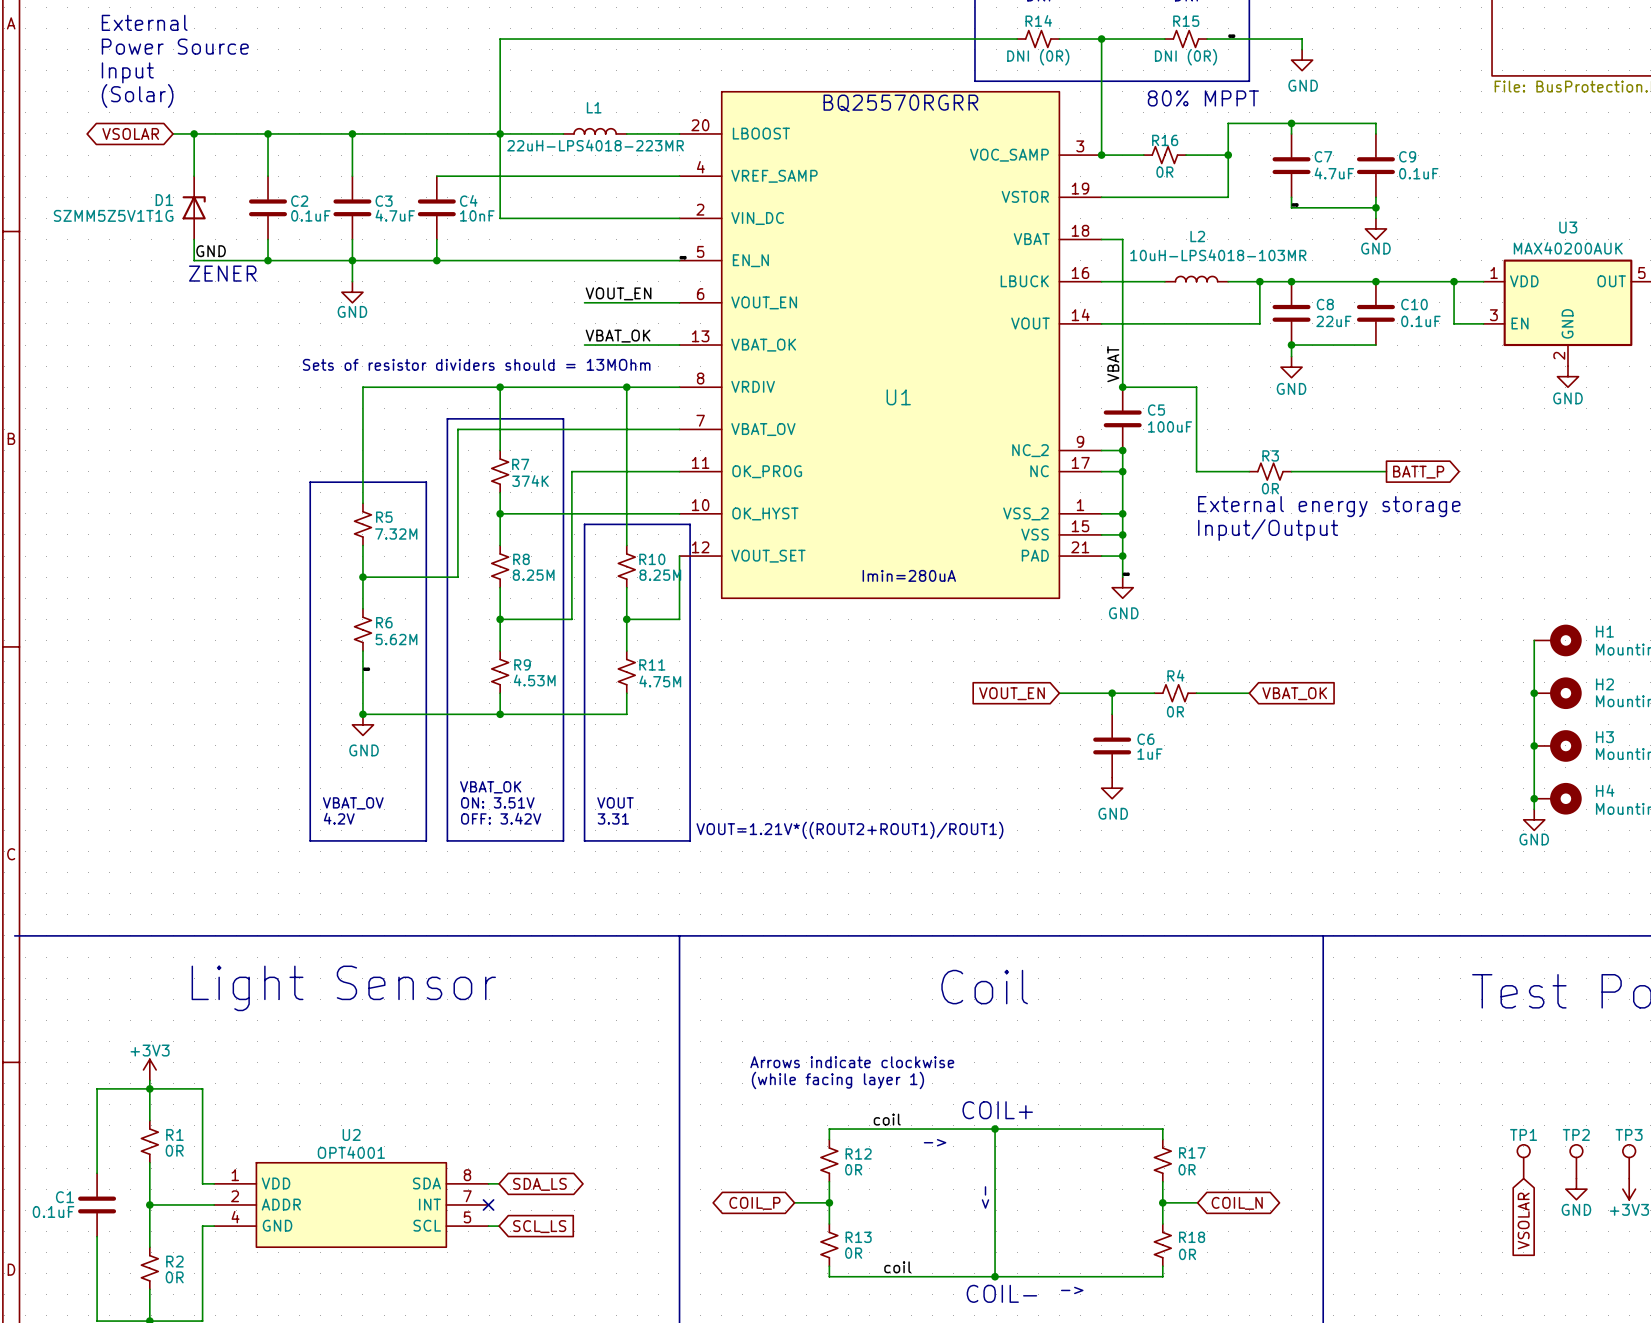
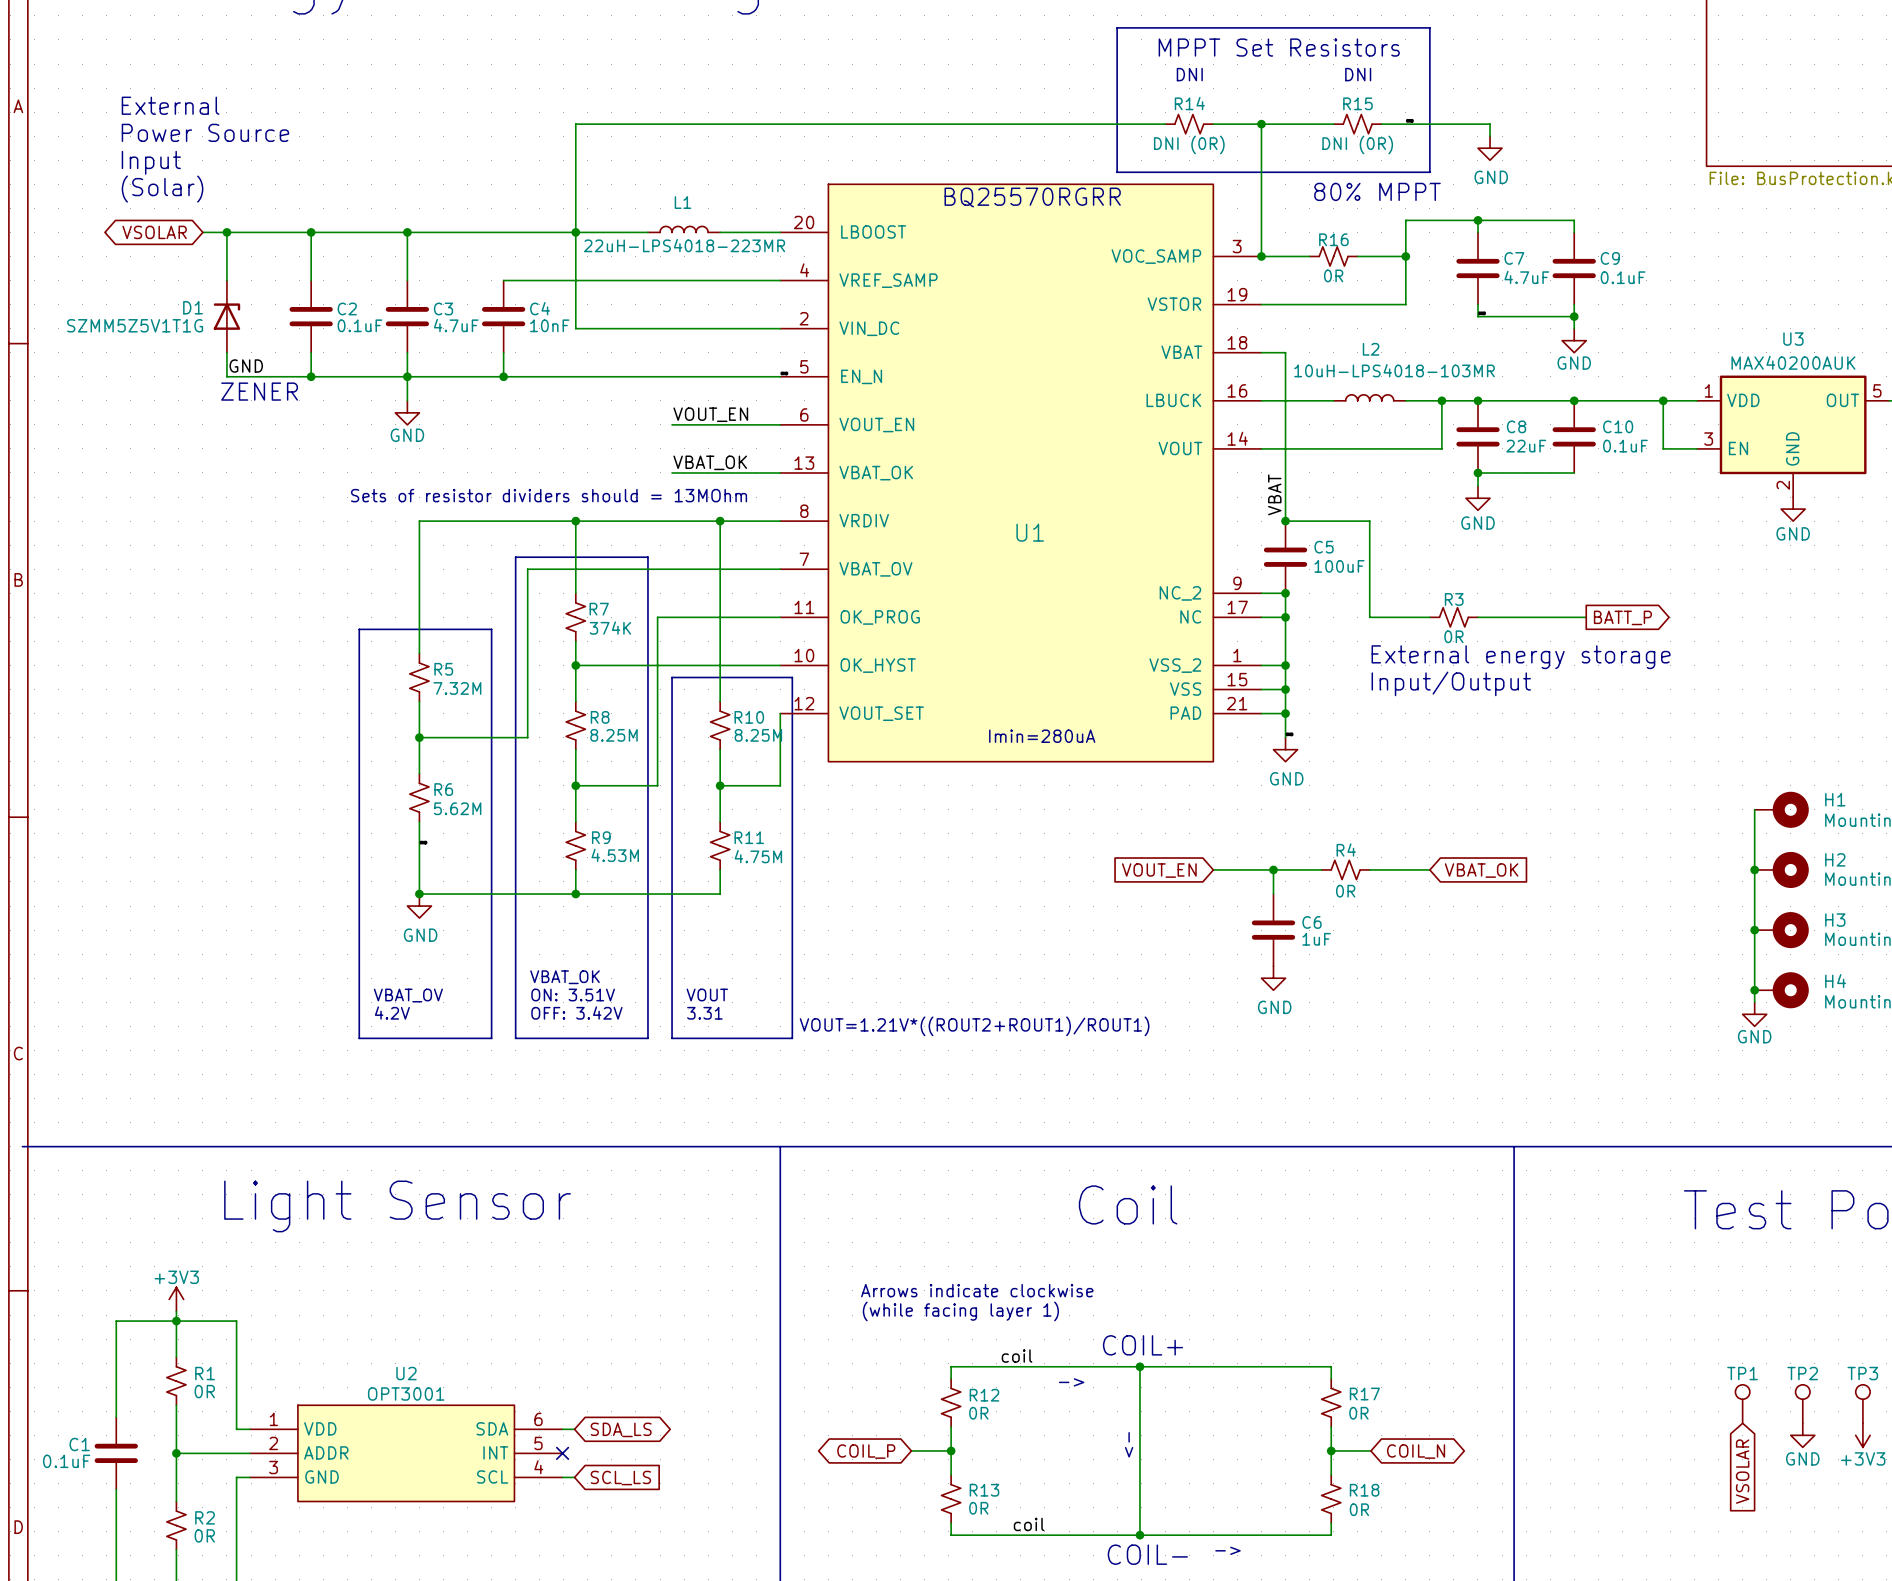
U2 value: OPT4001 (351, 1152) -> OPT3001 (406, 1393)
U2 pin number: 8 (467, 1175) -> 6 (538, 1419)
U2 pin number: 7 (467, 1196) -> 5 (538, 1443)
U2 pin number: 4 (235, 1217) -> 3 (273, 1467)
U2 pin number: 5 (467, 1217) -> 4 (538, 1467)

